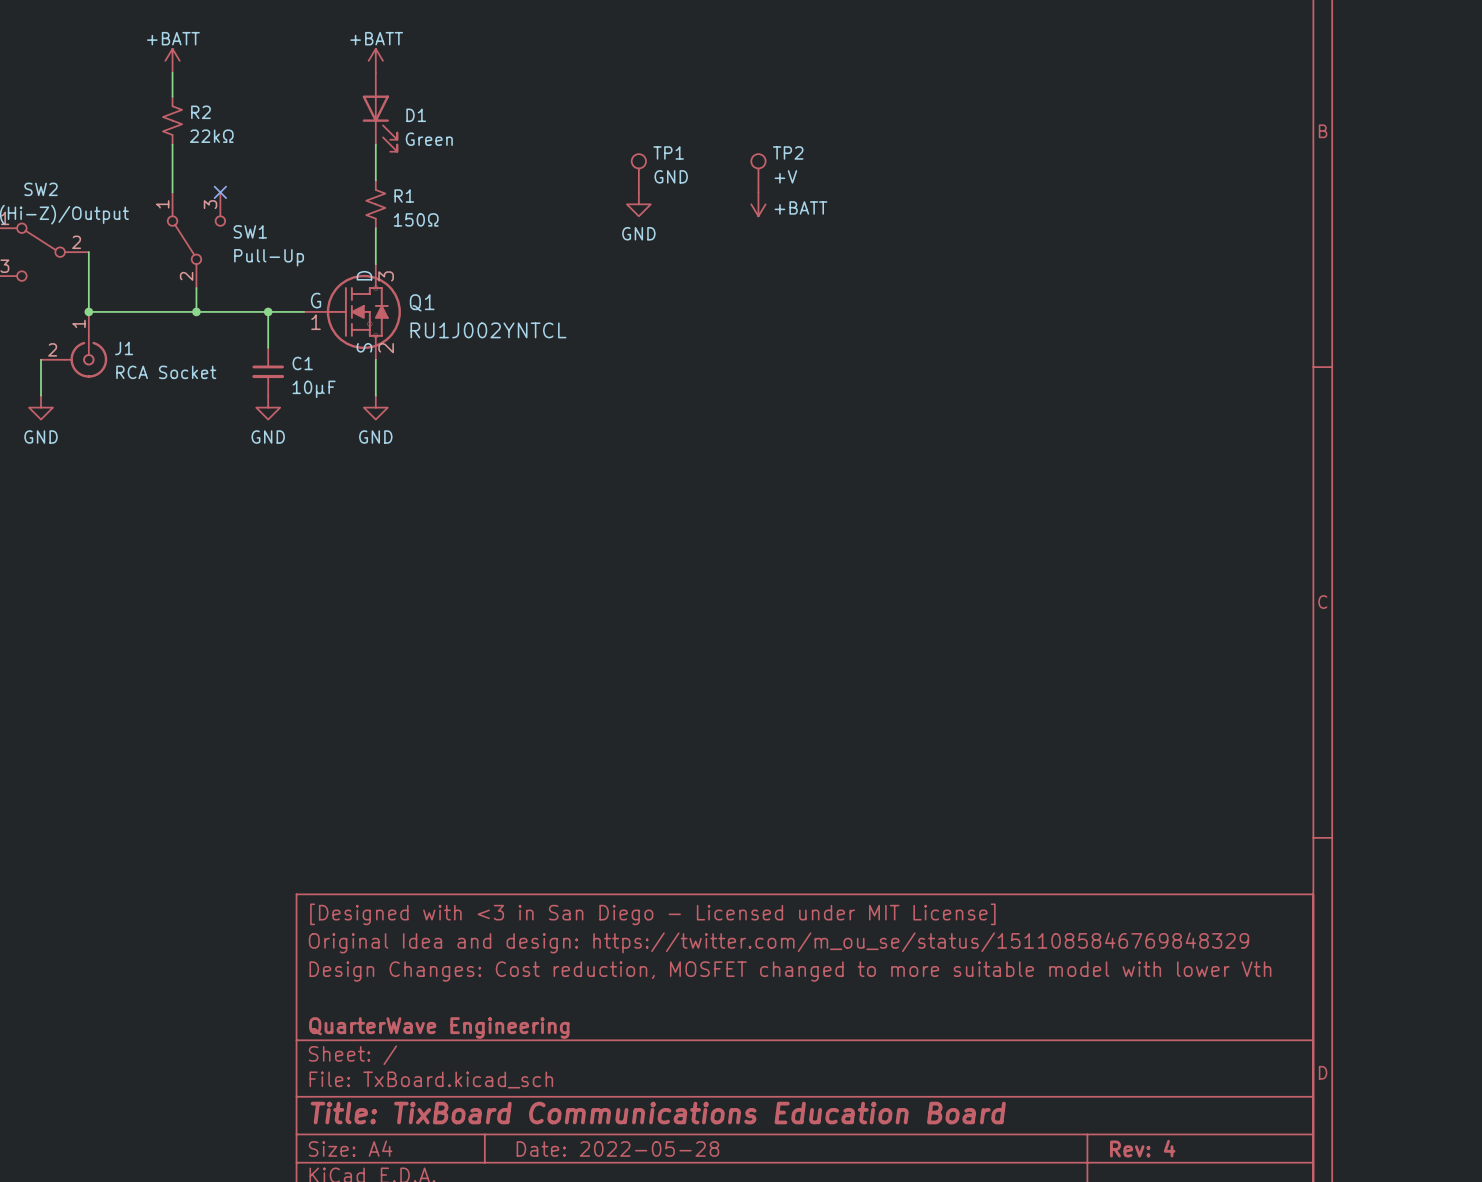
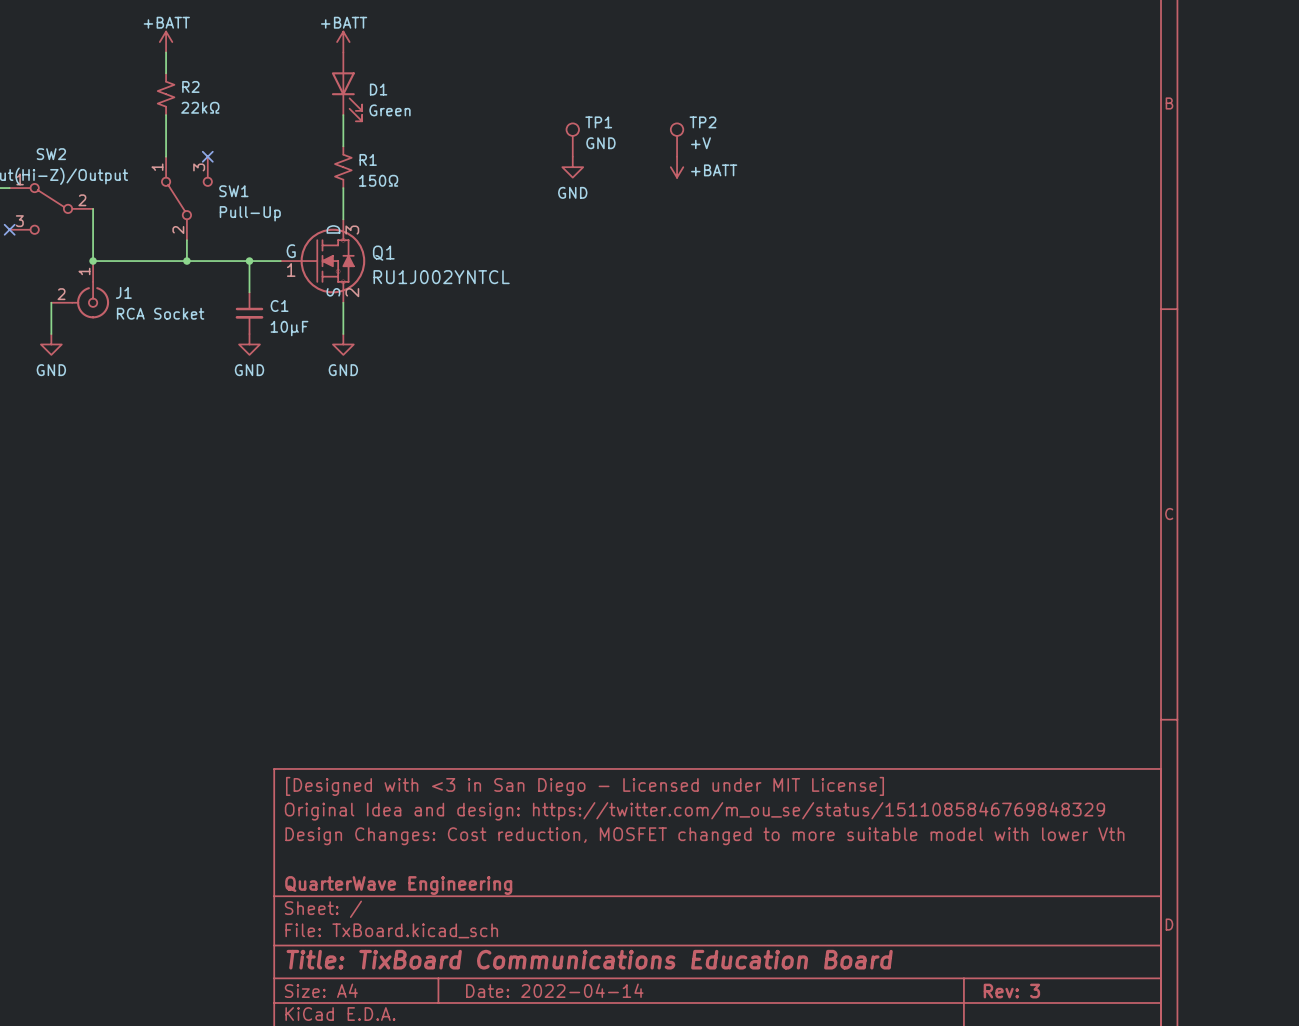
title block: Date: 2022-05-28 (617, 1148) -> Date: 2022-04-14 (554, 990)
title block: Rev: 4 (1142, 1148) -> Rev: 3 (1011, 991)

